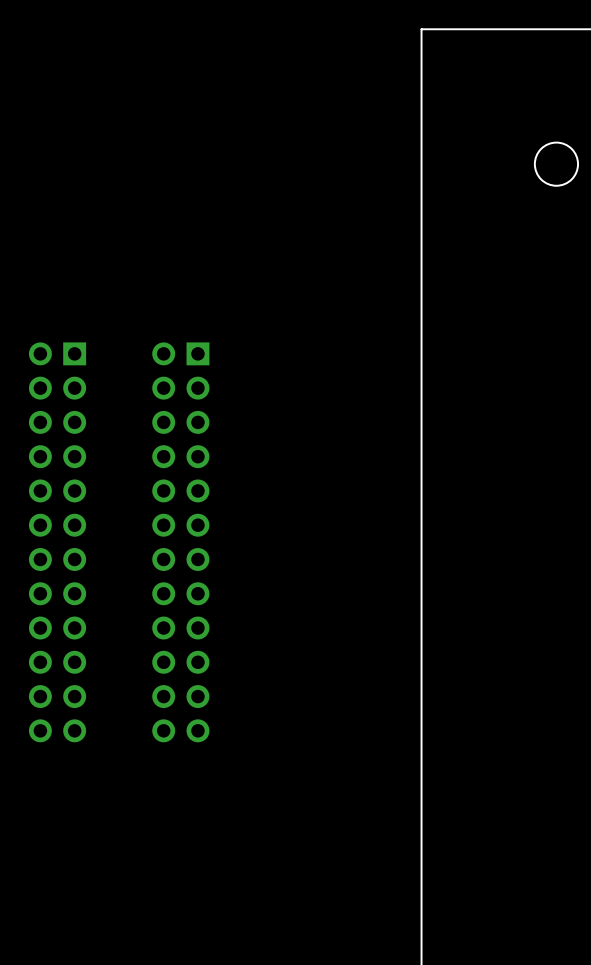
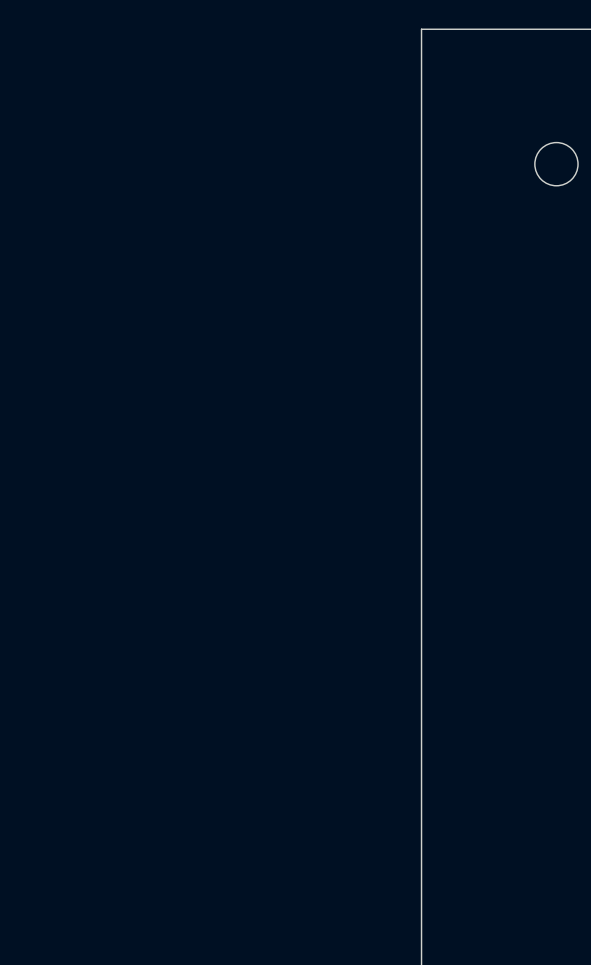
part: (57, 542) -> none
part: (180, 542) -> none

